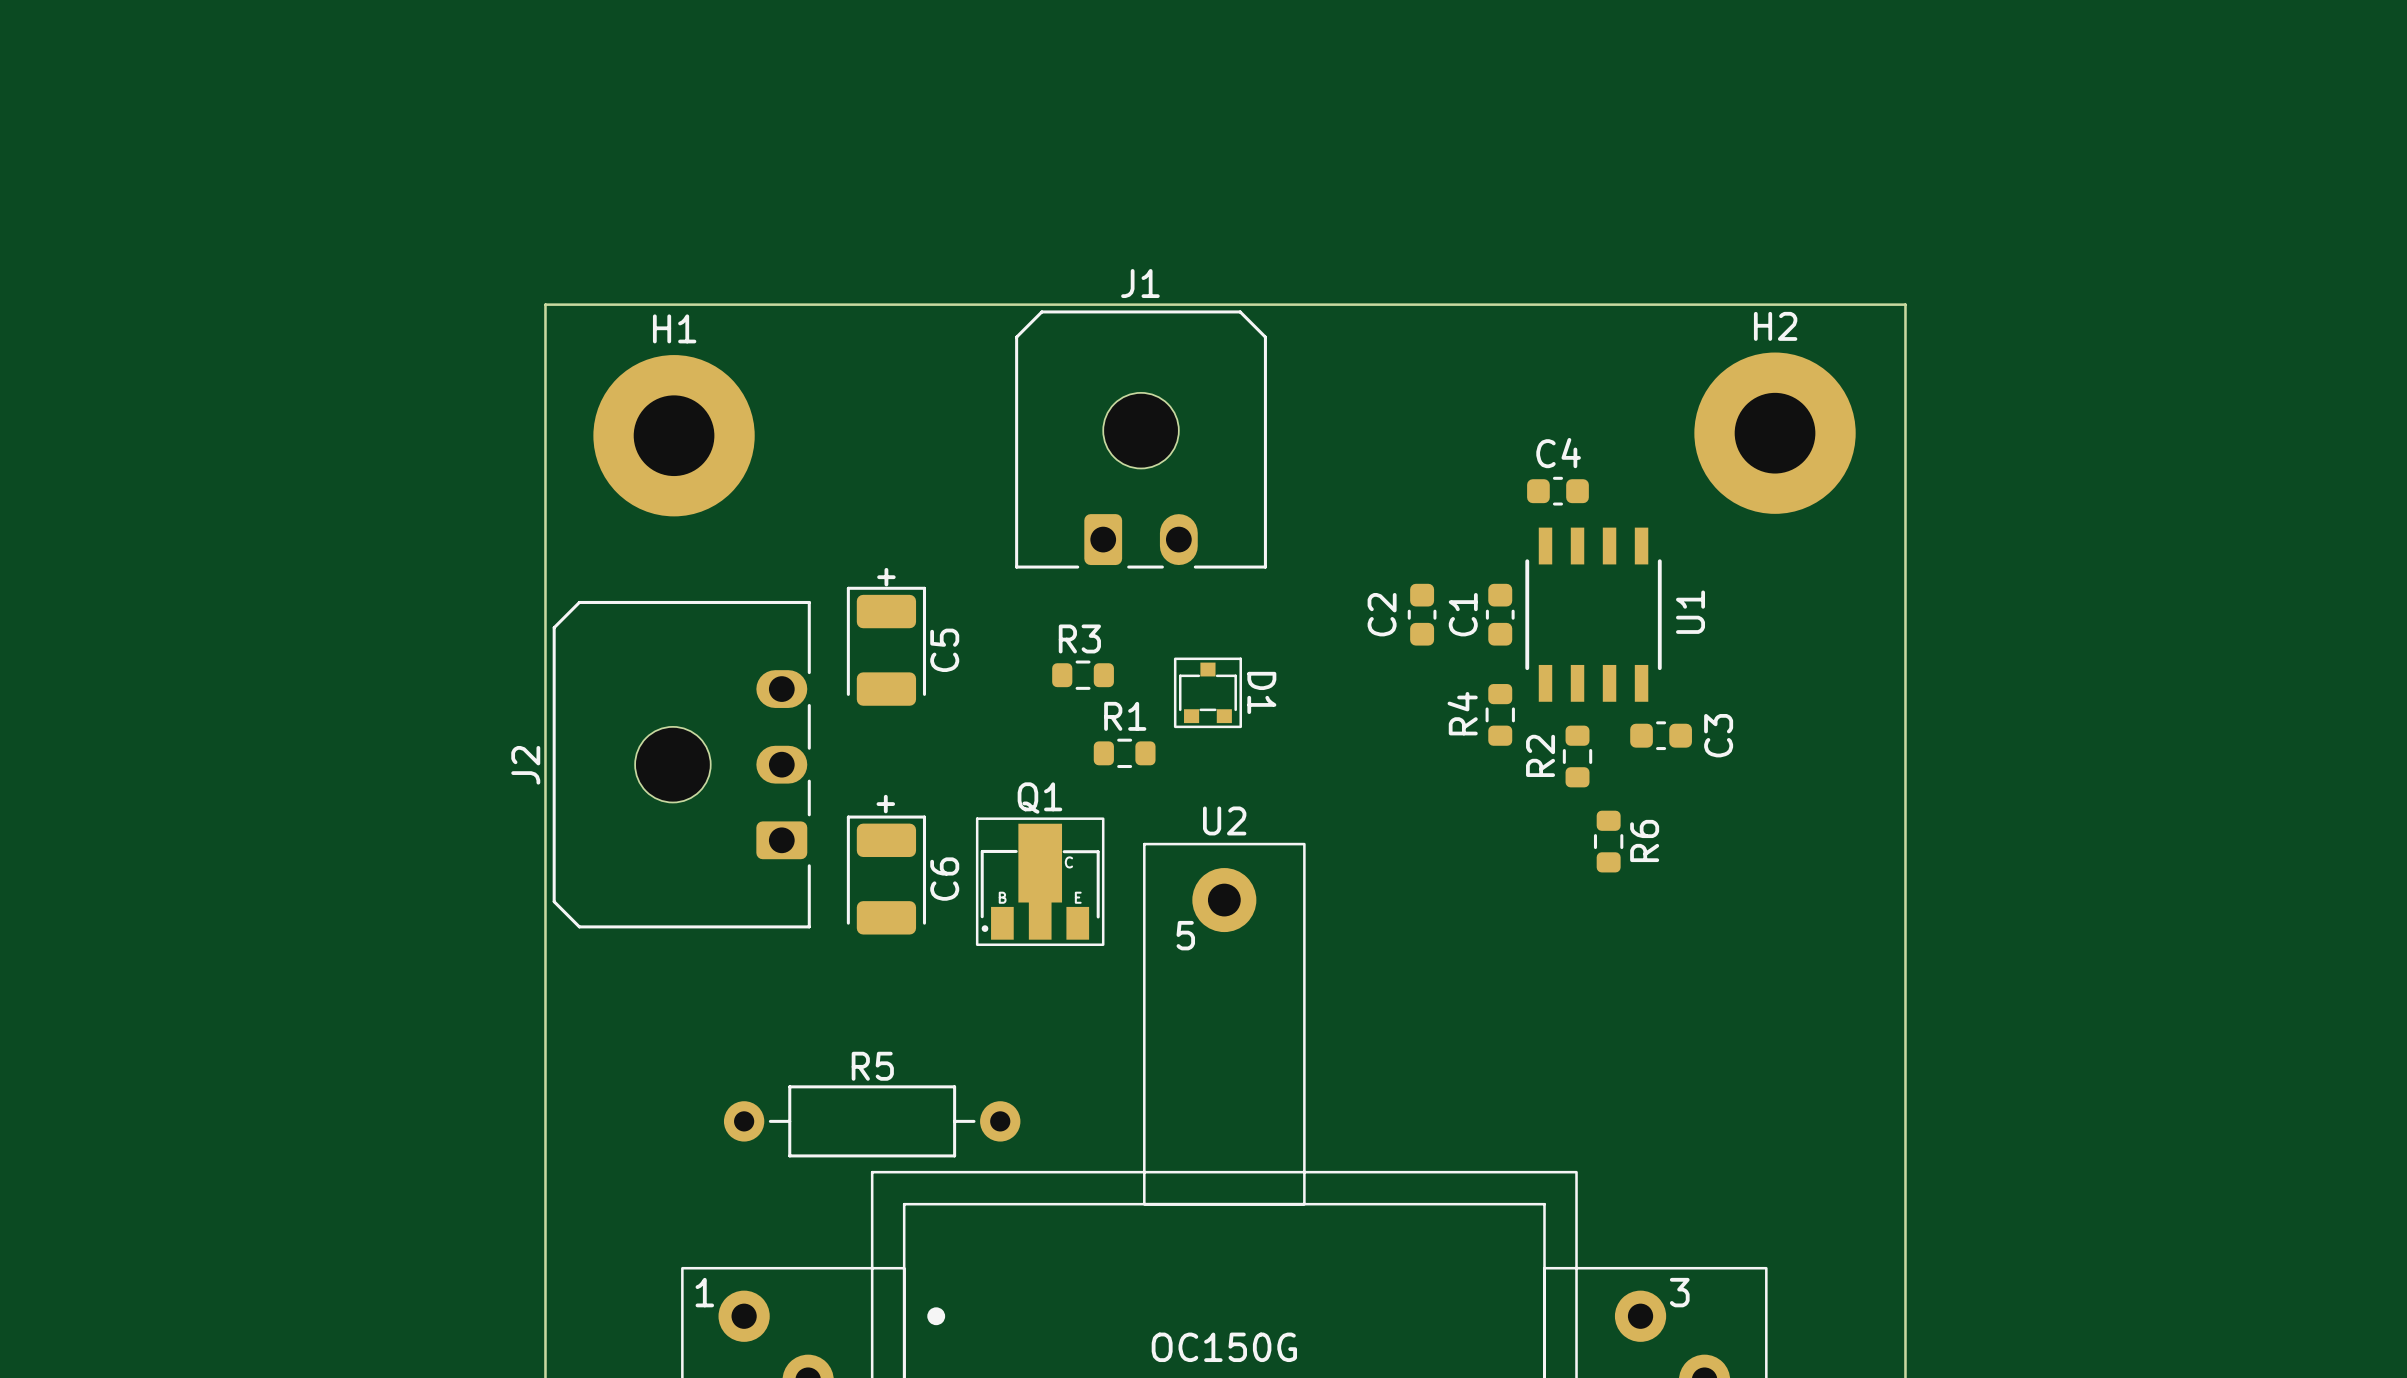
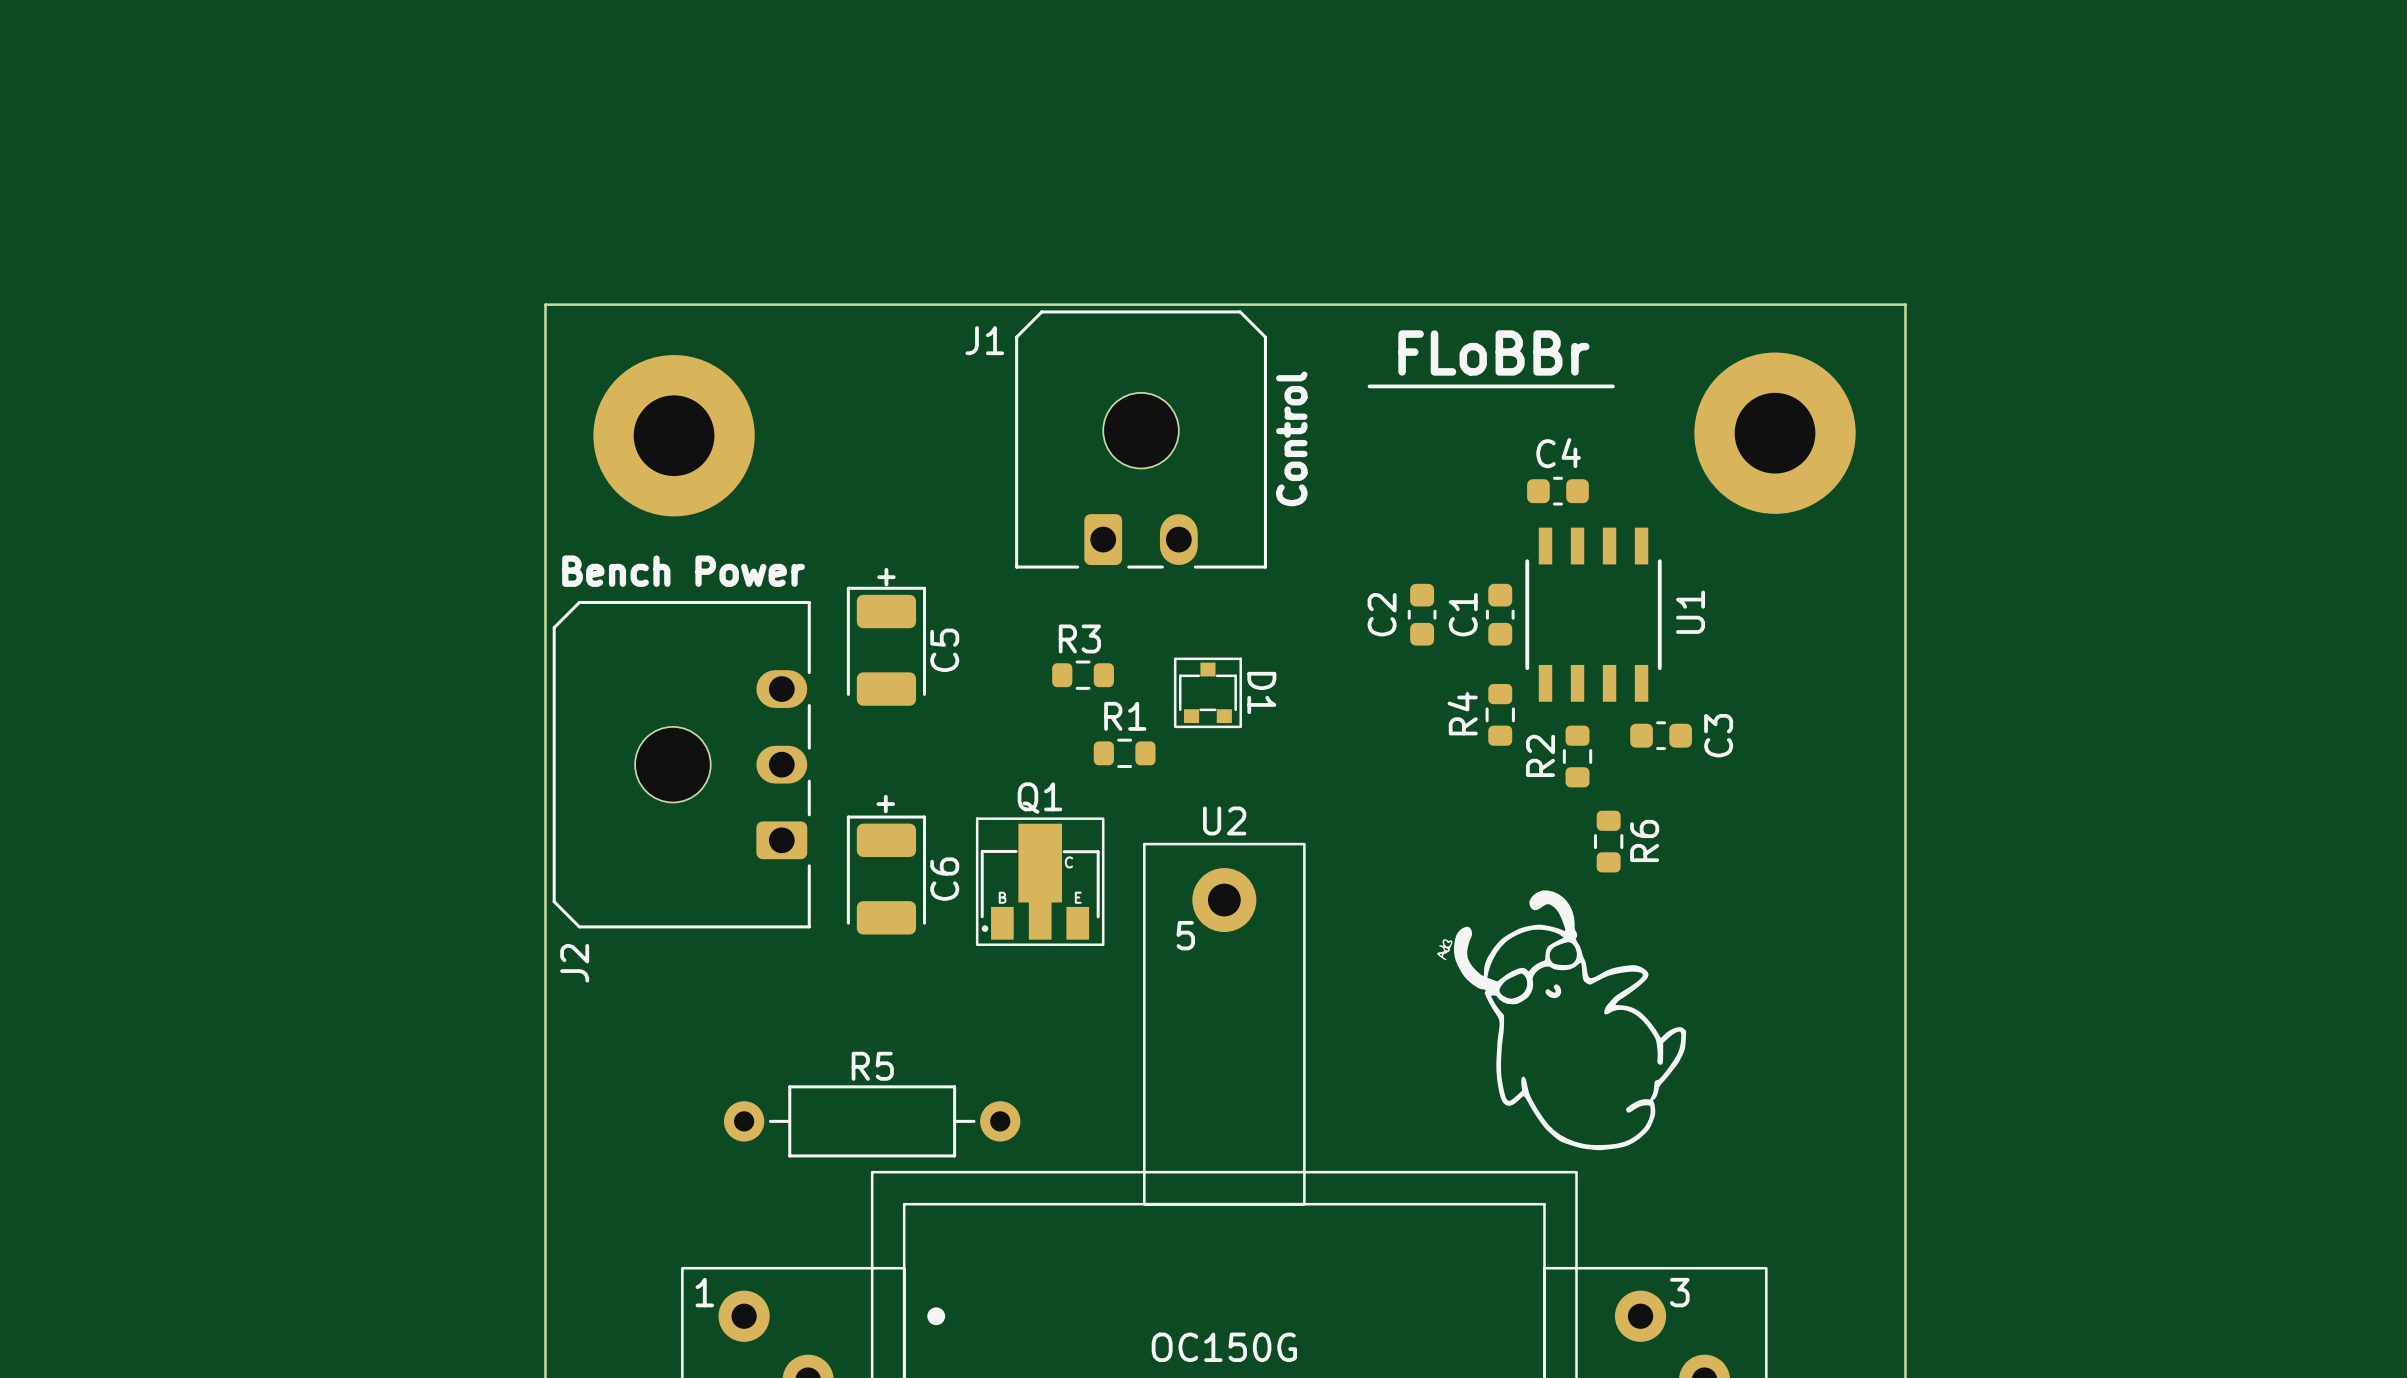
J1 name position: J1 (1140, 283) -> J1 (984, 340)
H2 name: H2 (1775, 326) -> none
H1 name: H1 (674, 328) -> none
text: none -> FLoBBr (1493, 352)
line: none -> (1369, 386) (1612, 386)
text: none -> Control (1291, 438)
text: none -> Bench Power (683, 571)
J2 name position: J2 (525, 765) -> J2 (574, 963)
drawing: none -> [1437, 890, 1687, 1151]

